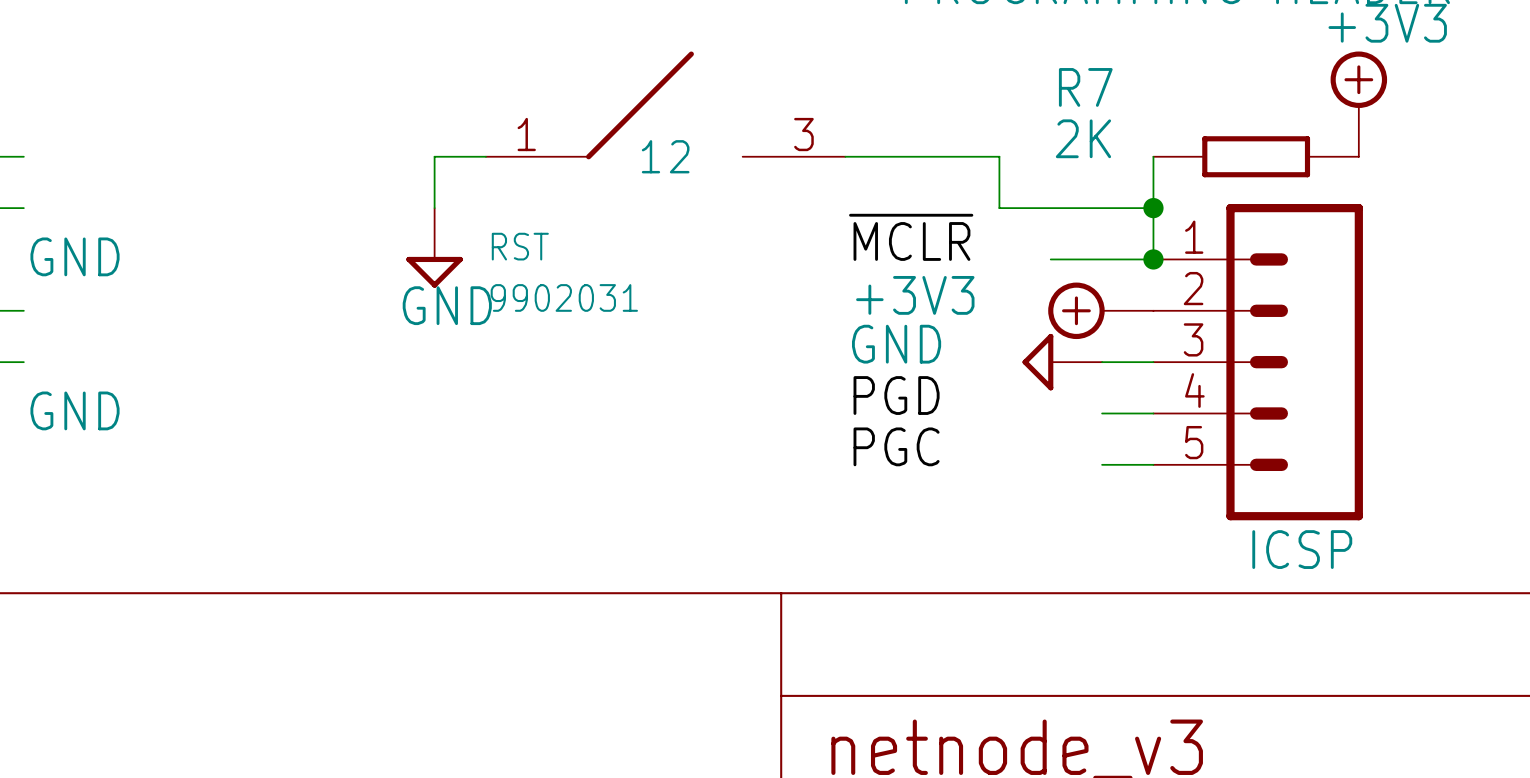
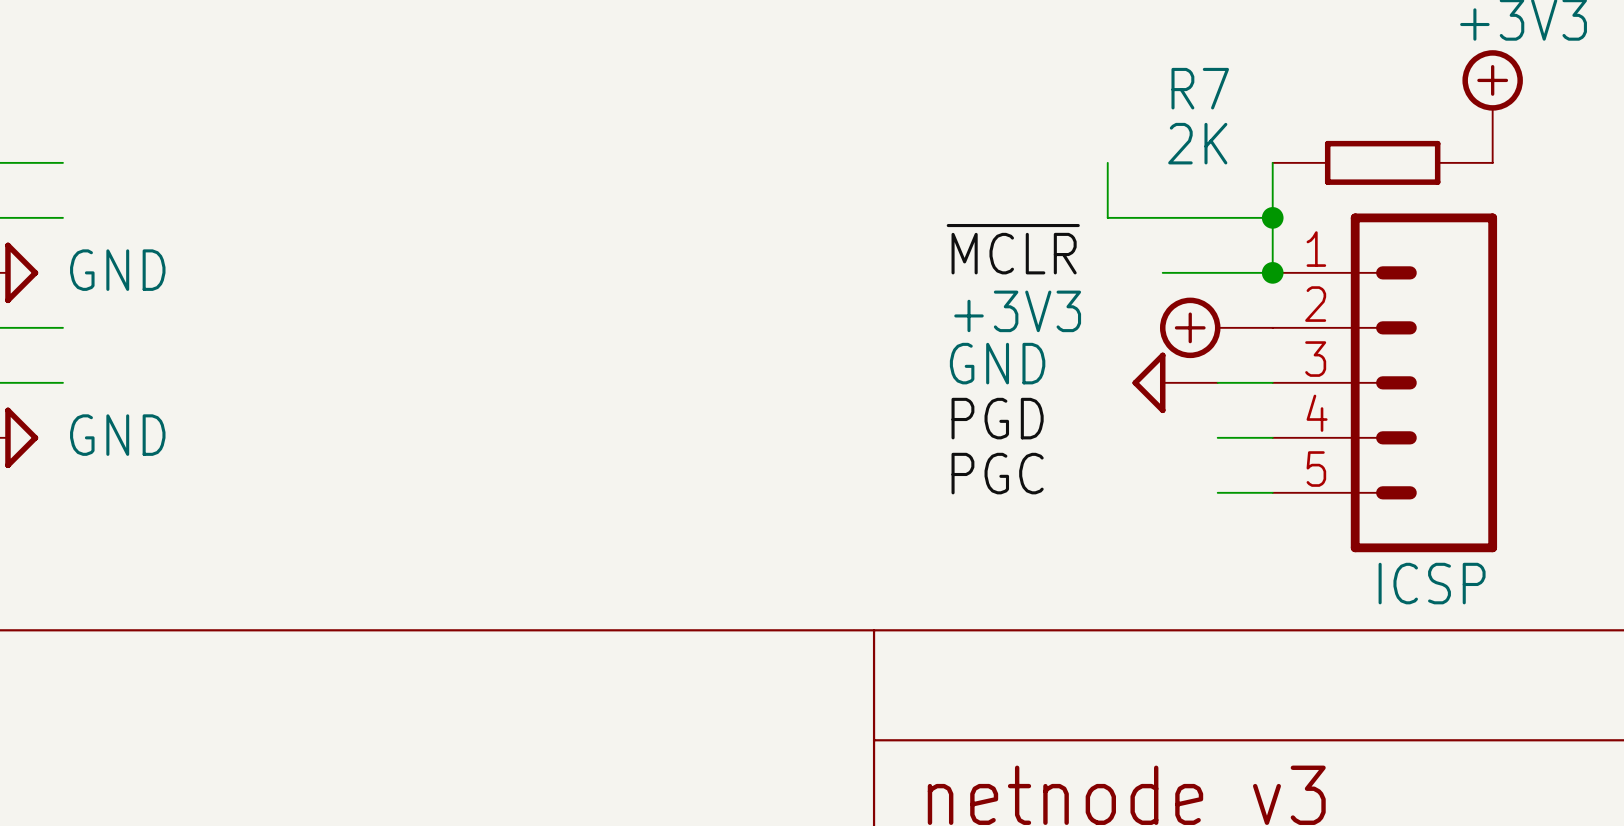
RST: 9902031 (665, 105) -> none
wire: (485, 156) (434, 156) (434, 208) -> none
wire: (845, 156) (999, 156) -> none
power symbol: GND (434, 247) -> none

